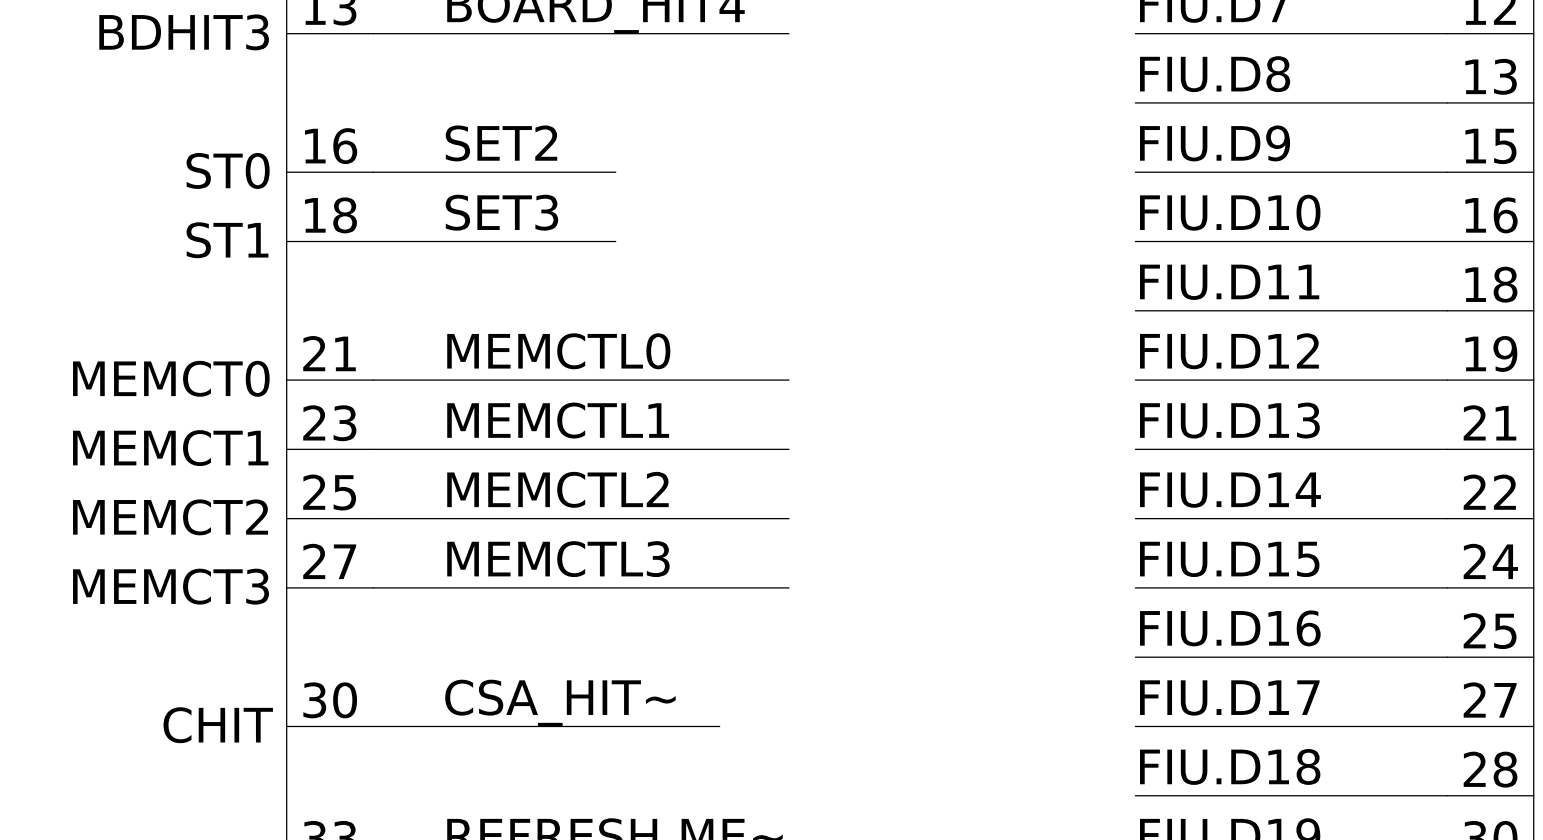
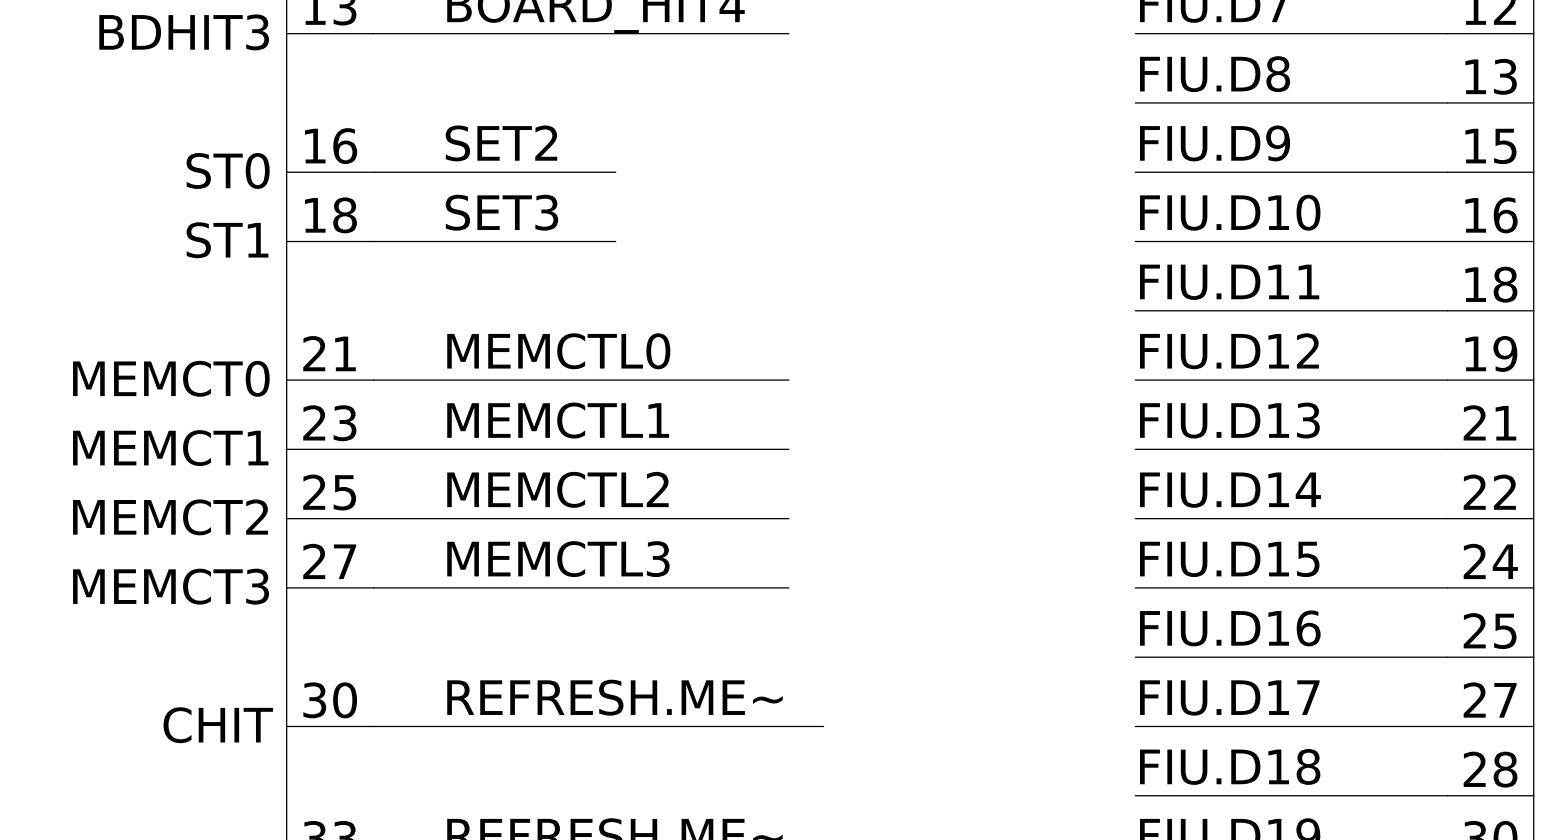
label: CSA_HIT~ (560, 702) -> REFRESH.ME~ (614, 697)
wire: none -> (719, 726) (823, 726)

